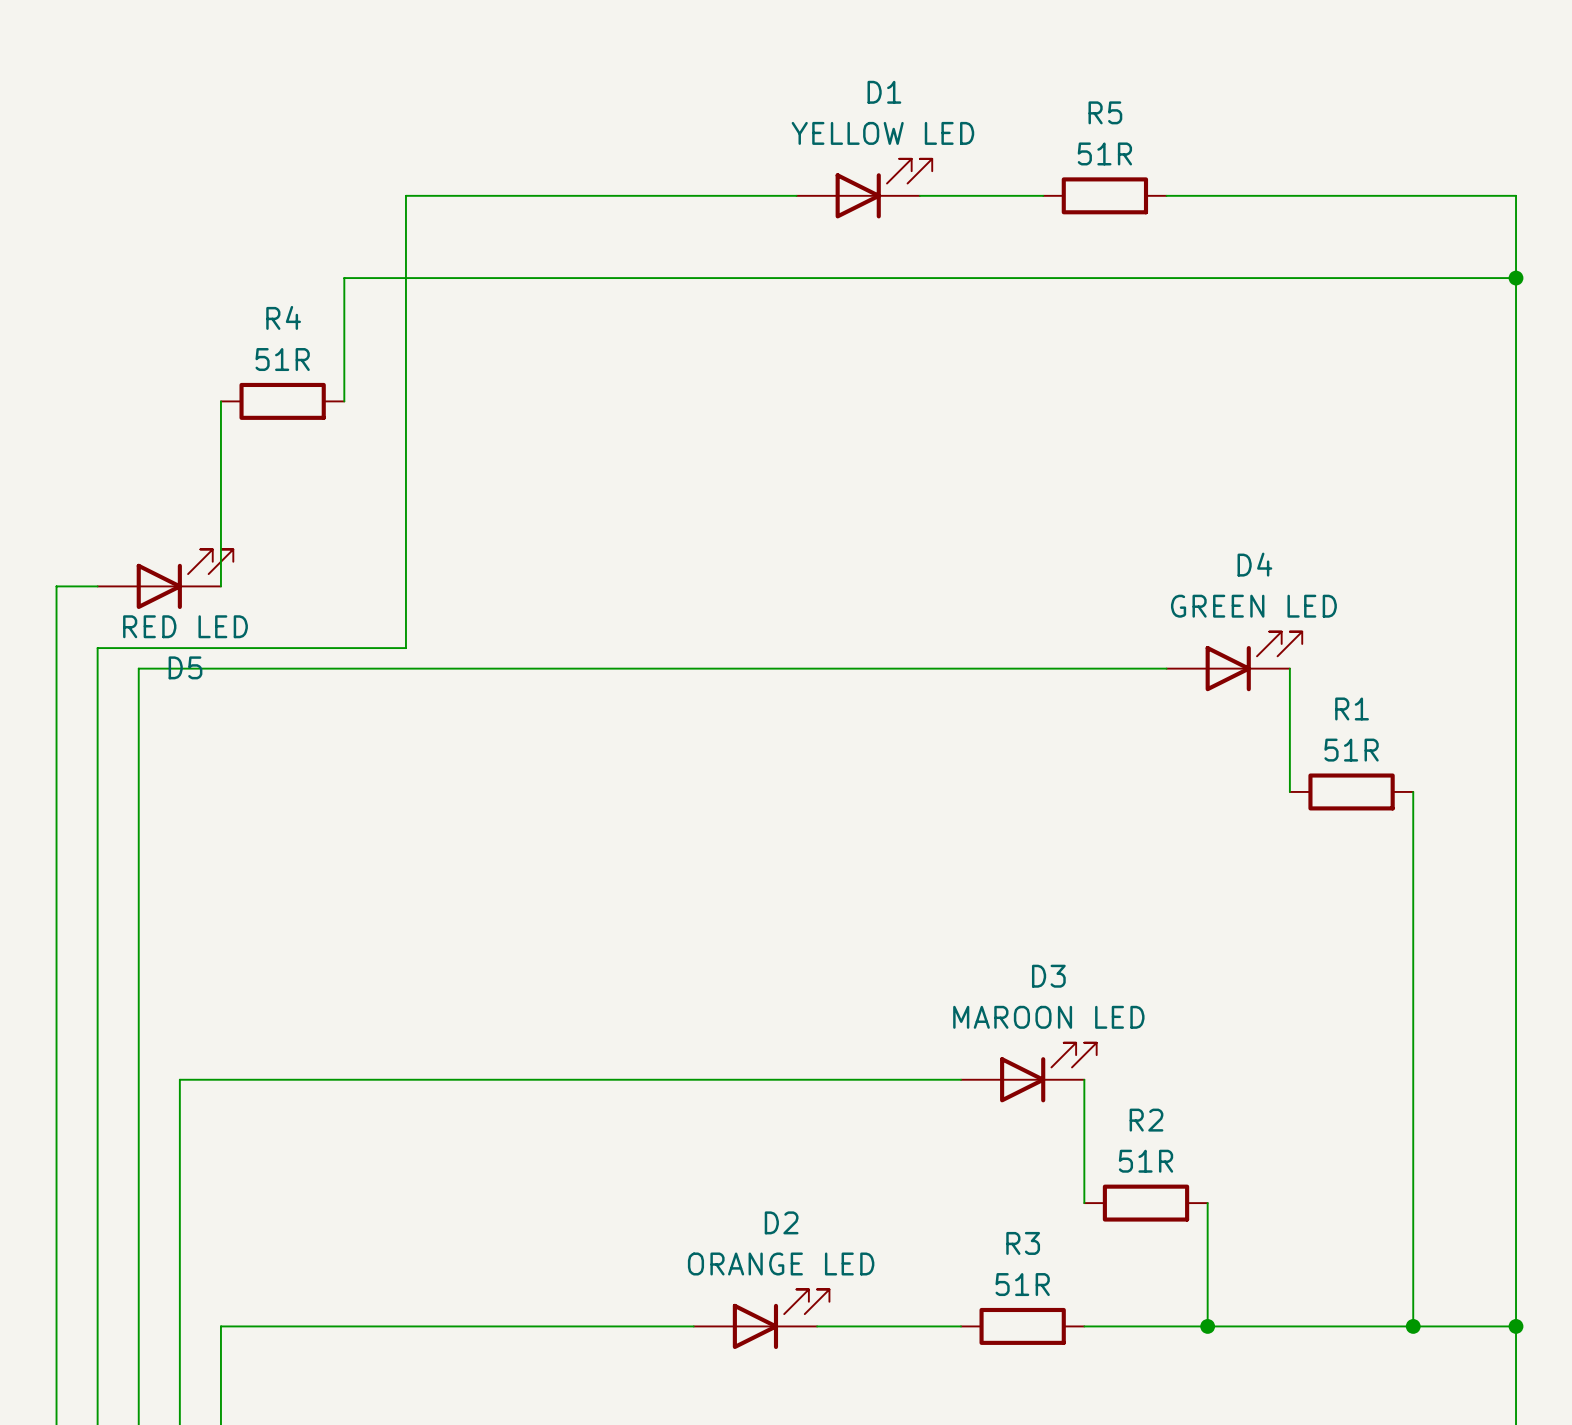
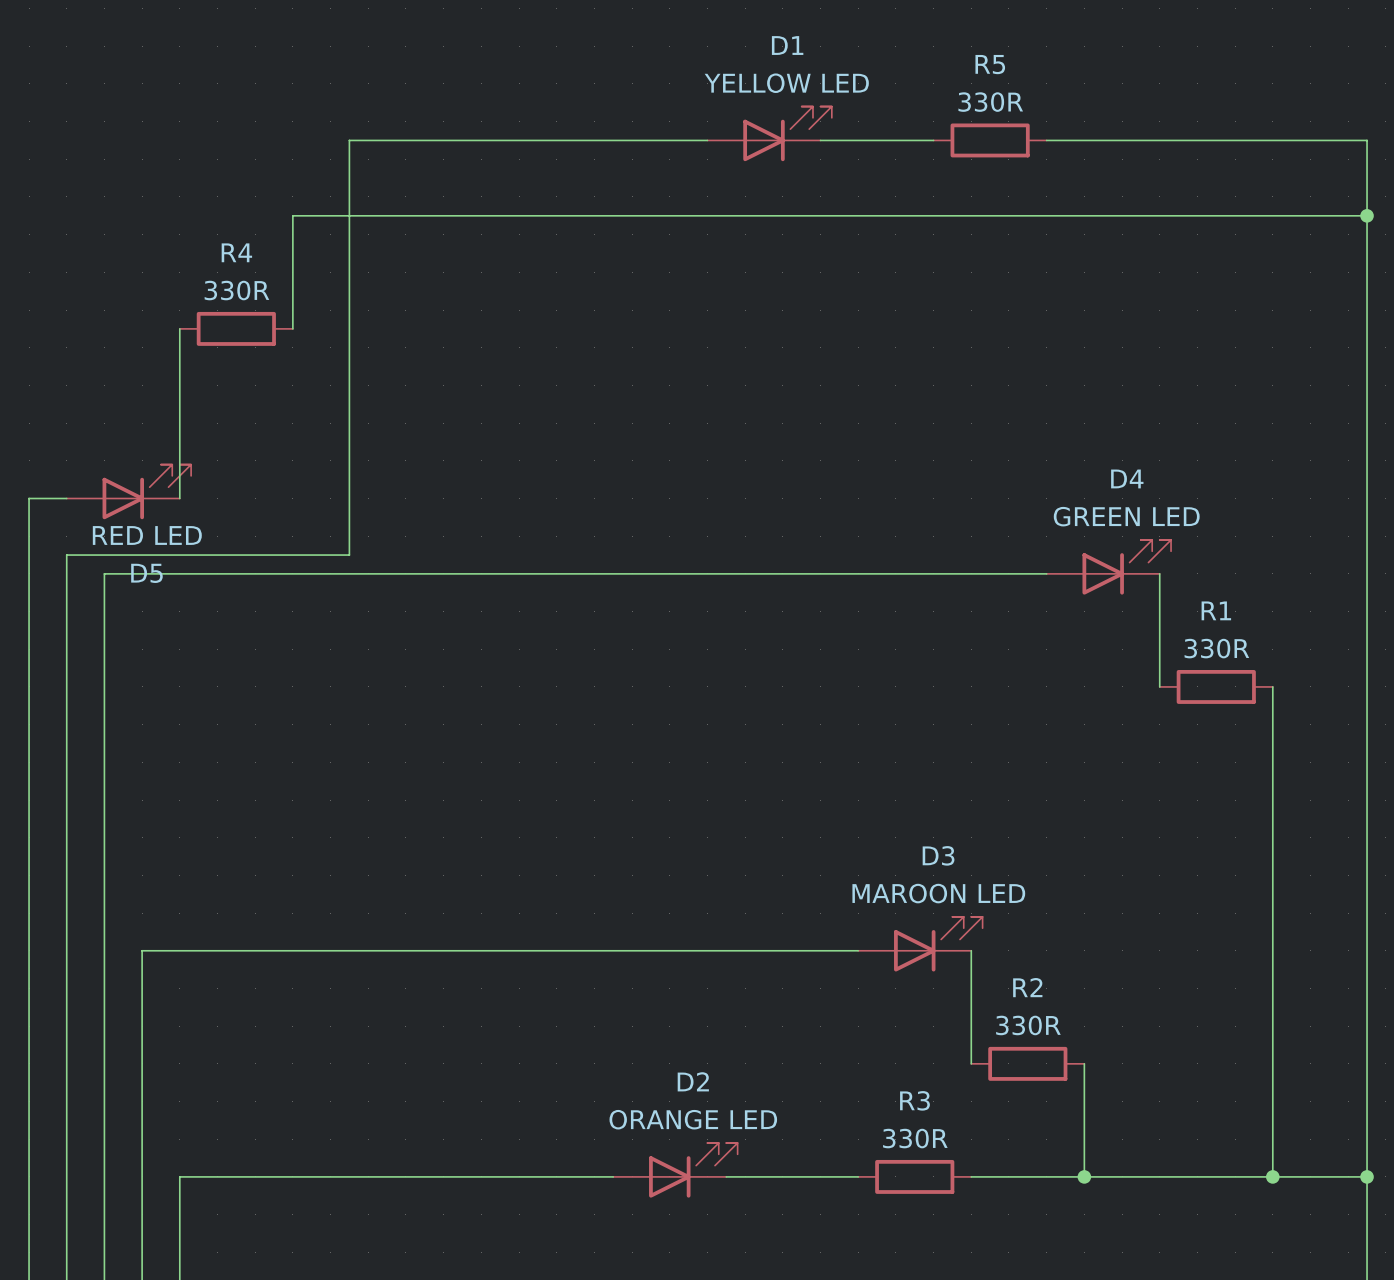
R5 value: 51R (1104, 153) -> 330R (990, 102)
R4 value: 51R (282, 359) -> 330R (236, 290)
R1 value: 51R (1351, 750) -> 330R (1216, 648)
R2 value: 51R (1146, 1161) -> 330R (1028, 1025)
R3 value: 51R (1022, 1284) -> 330R (915, 1138)

